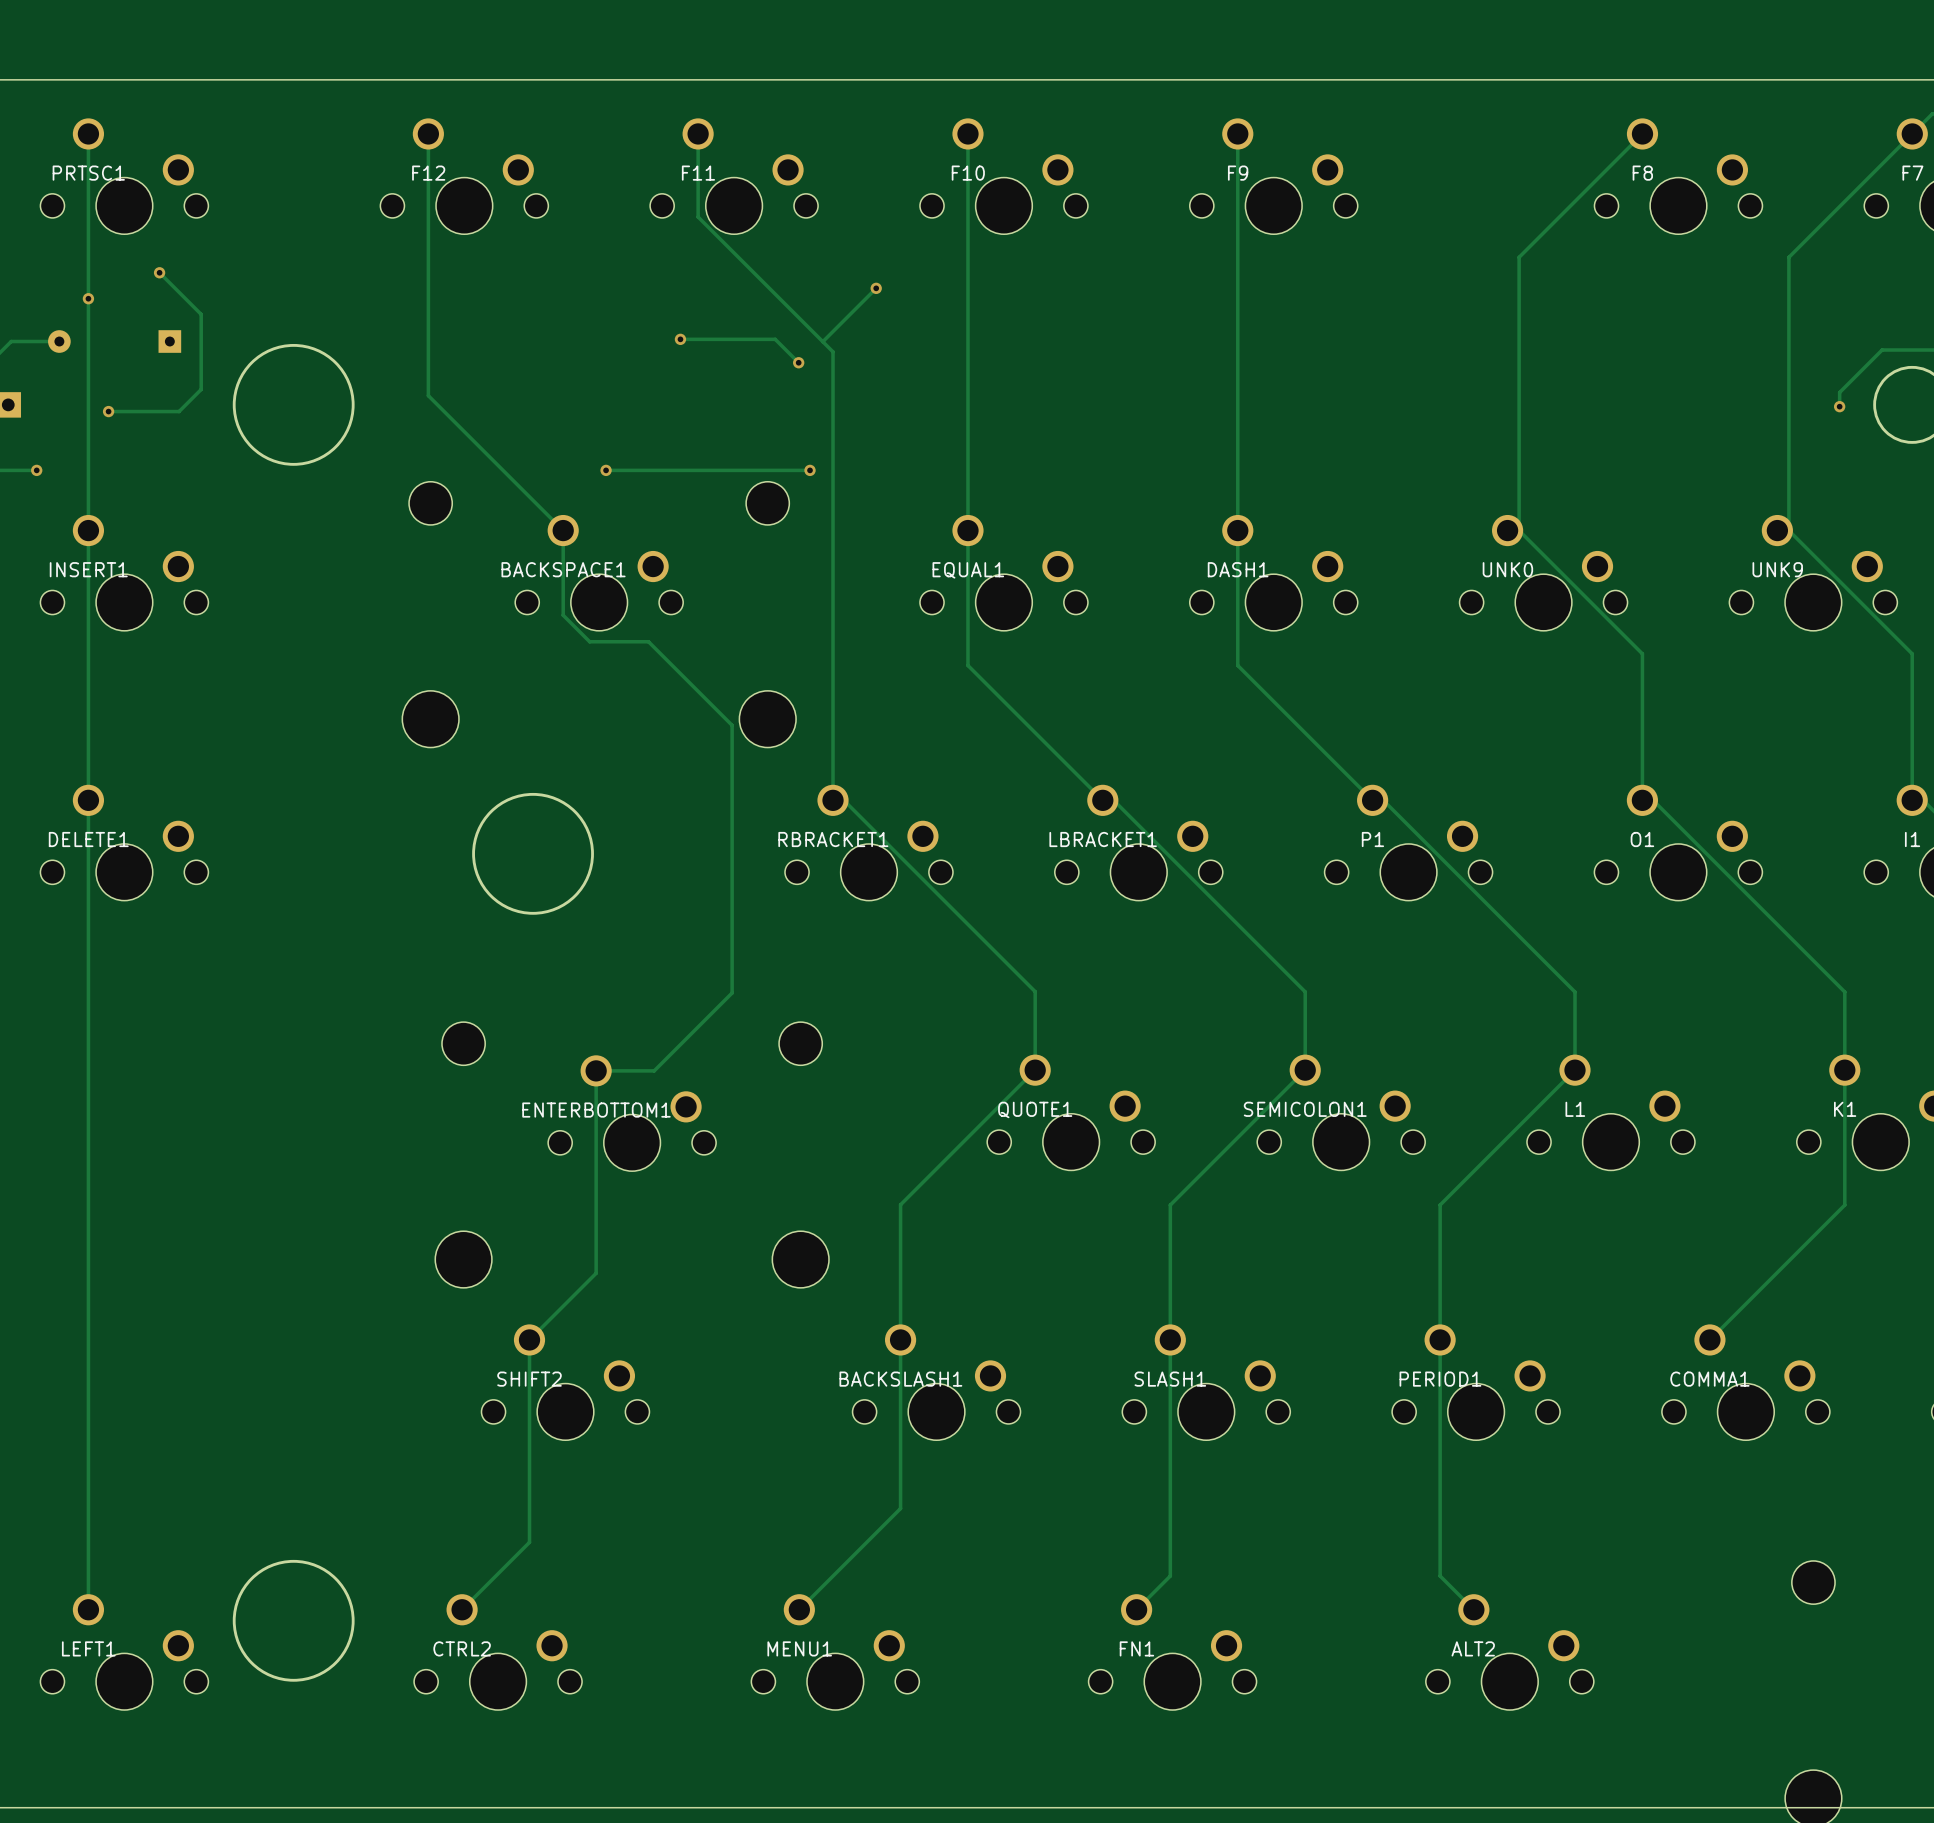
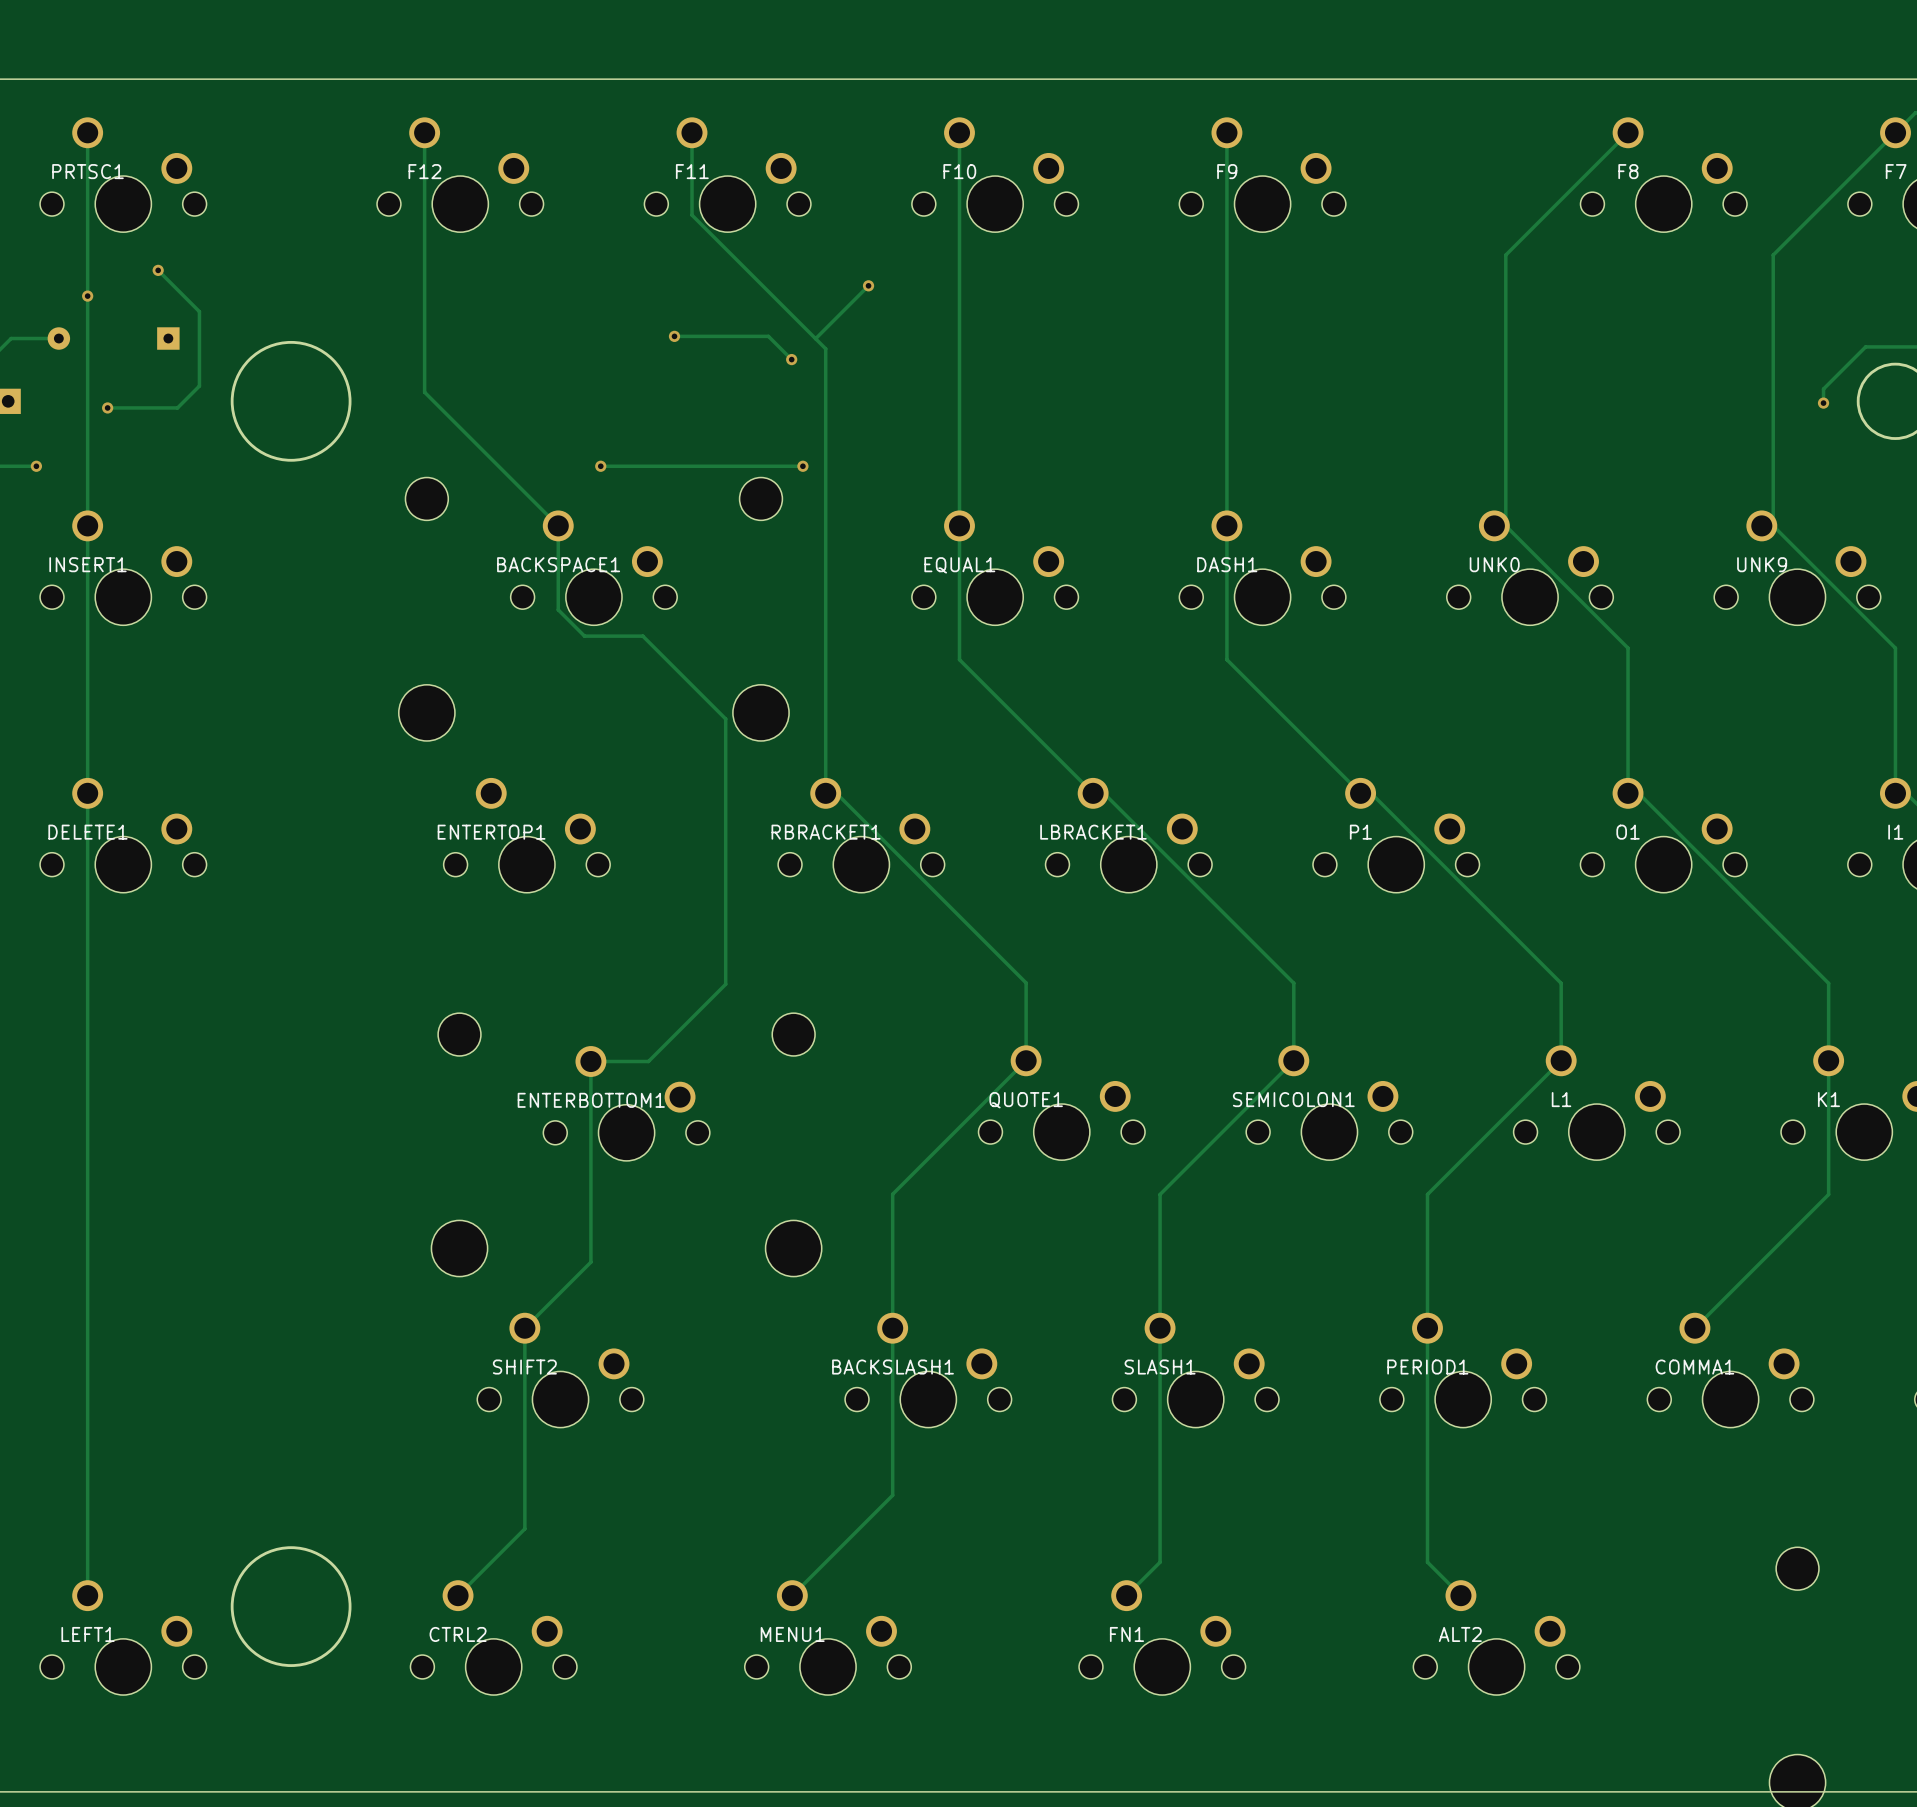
round board edge: [472, 792, 594, 915] -> none
ENTERTOP1: none -> (526, 835)

